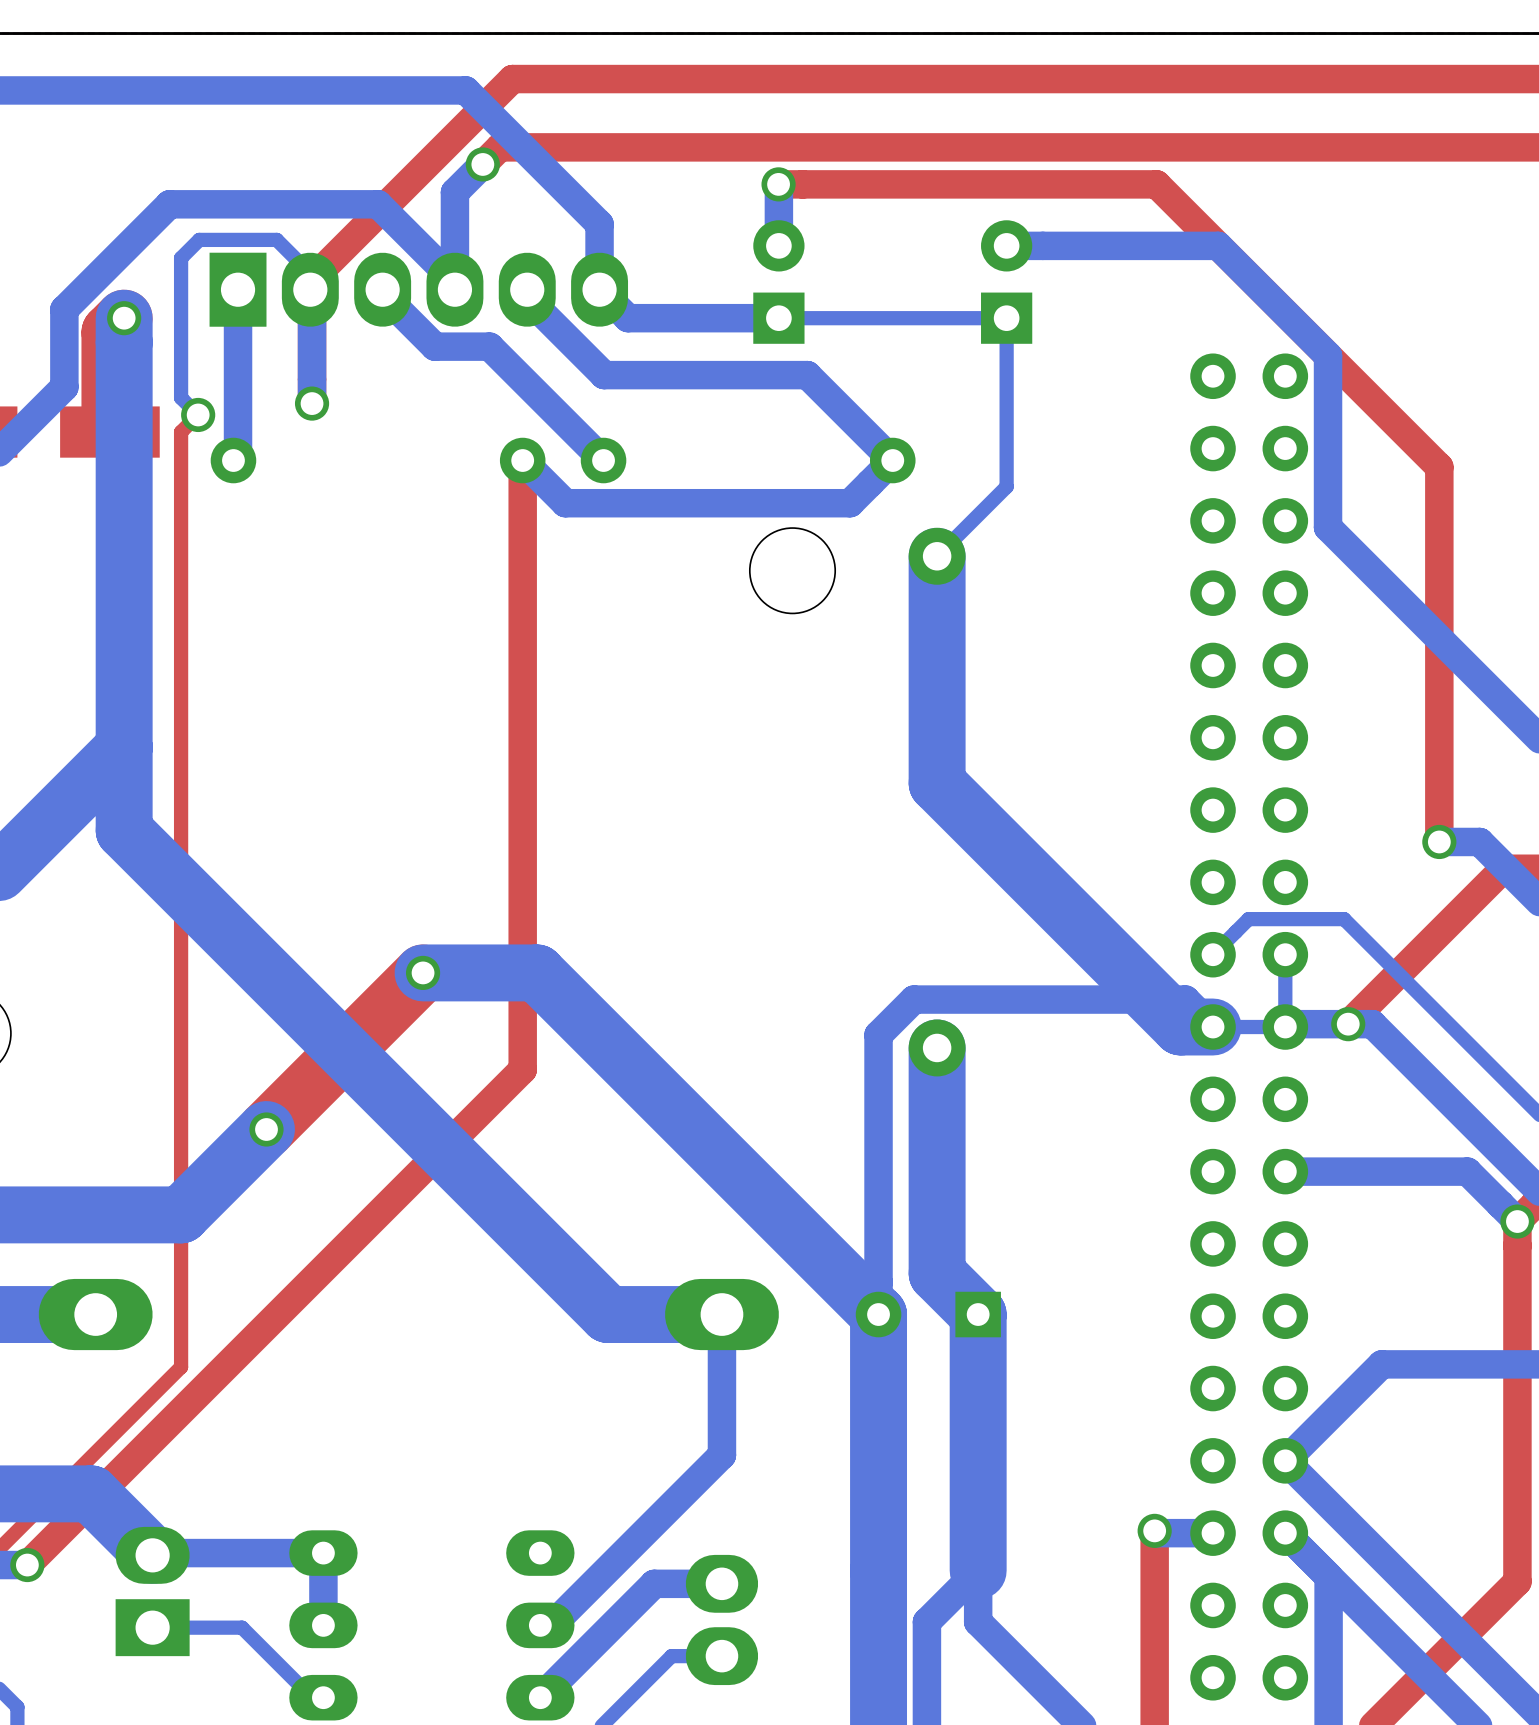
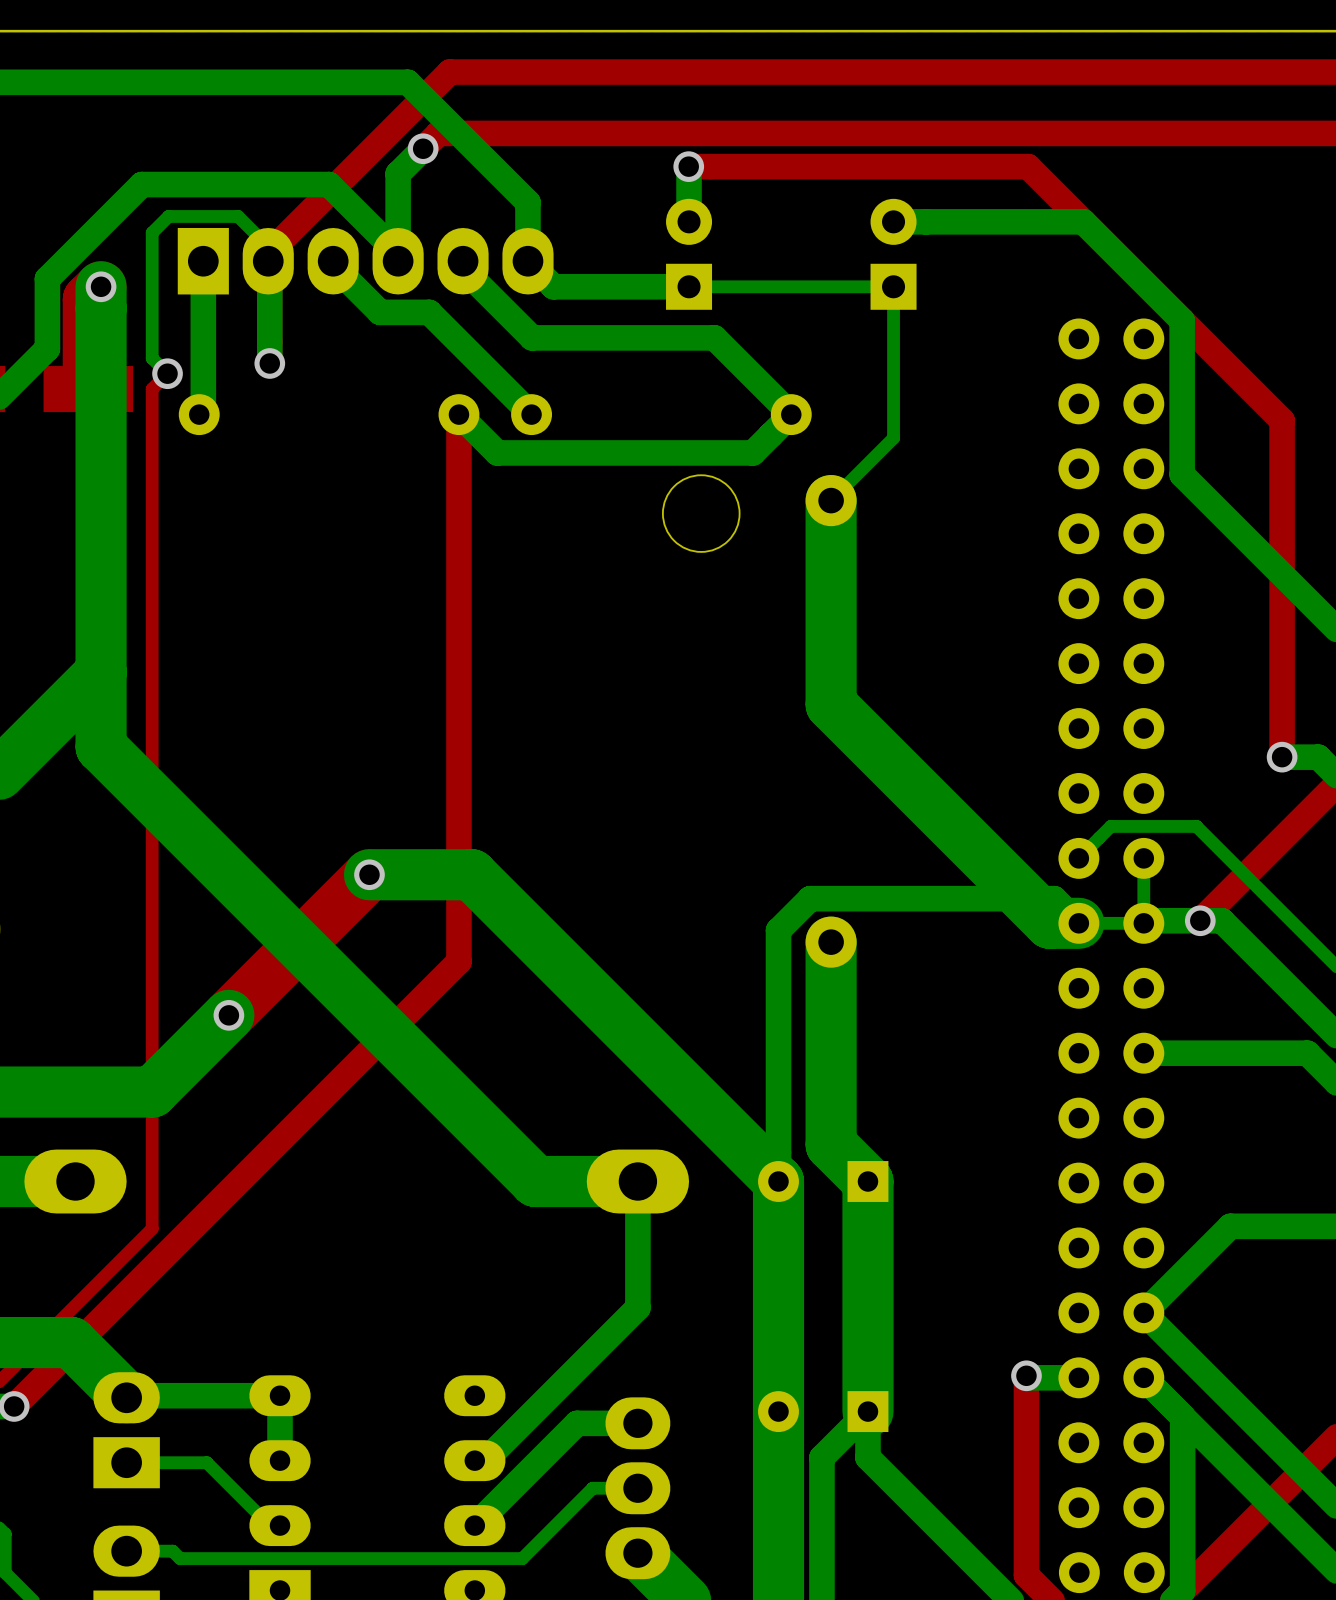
part: none -> (823, 1411)

